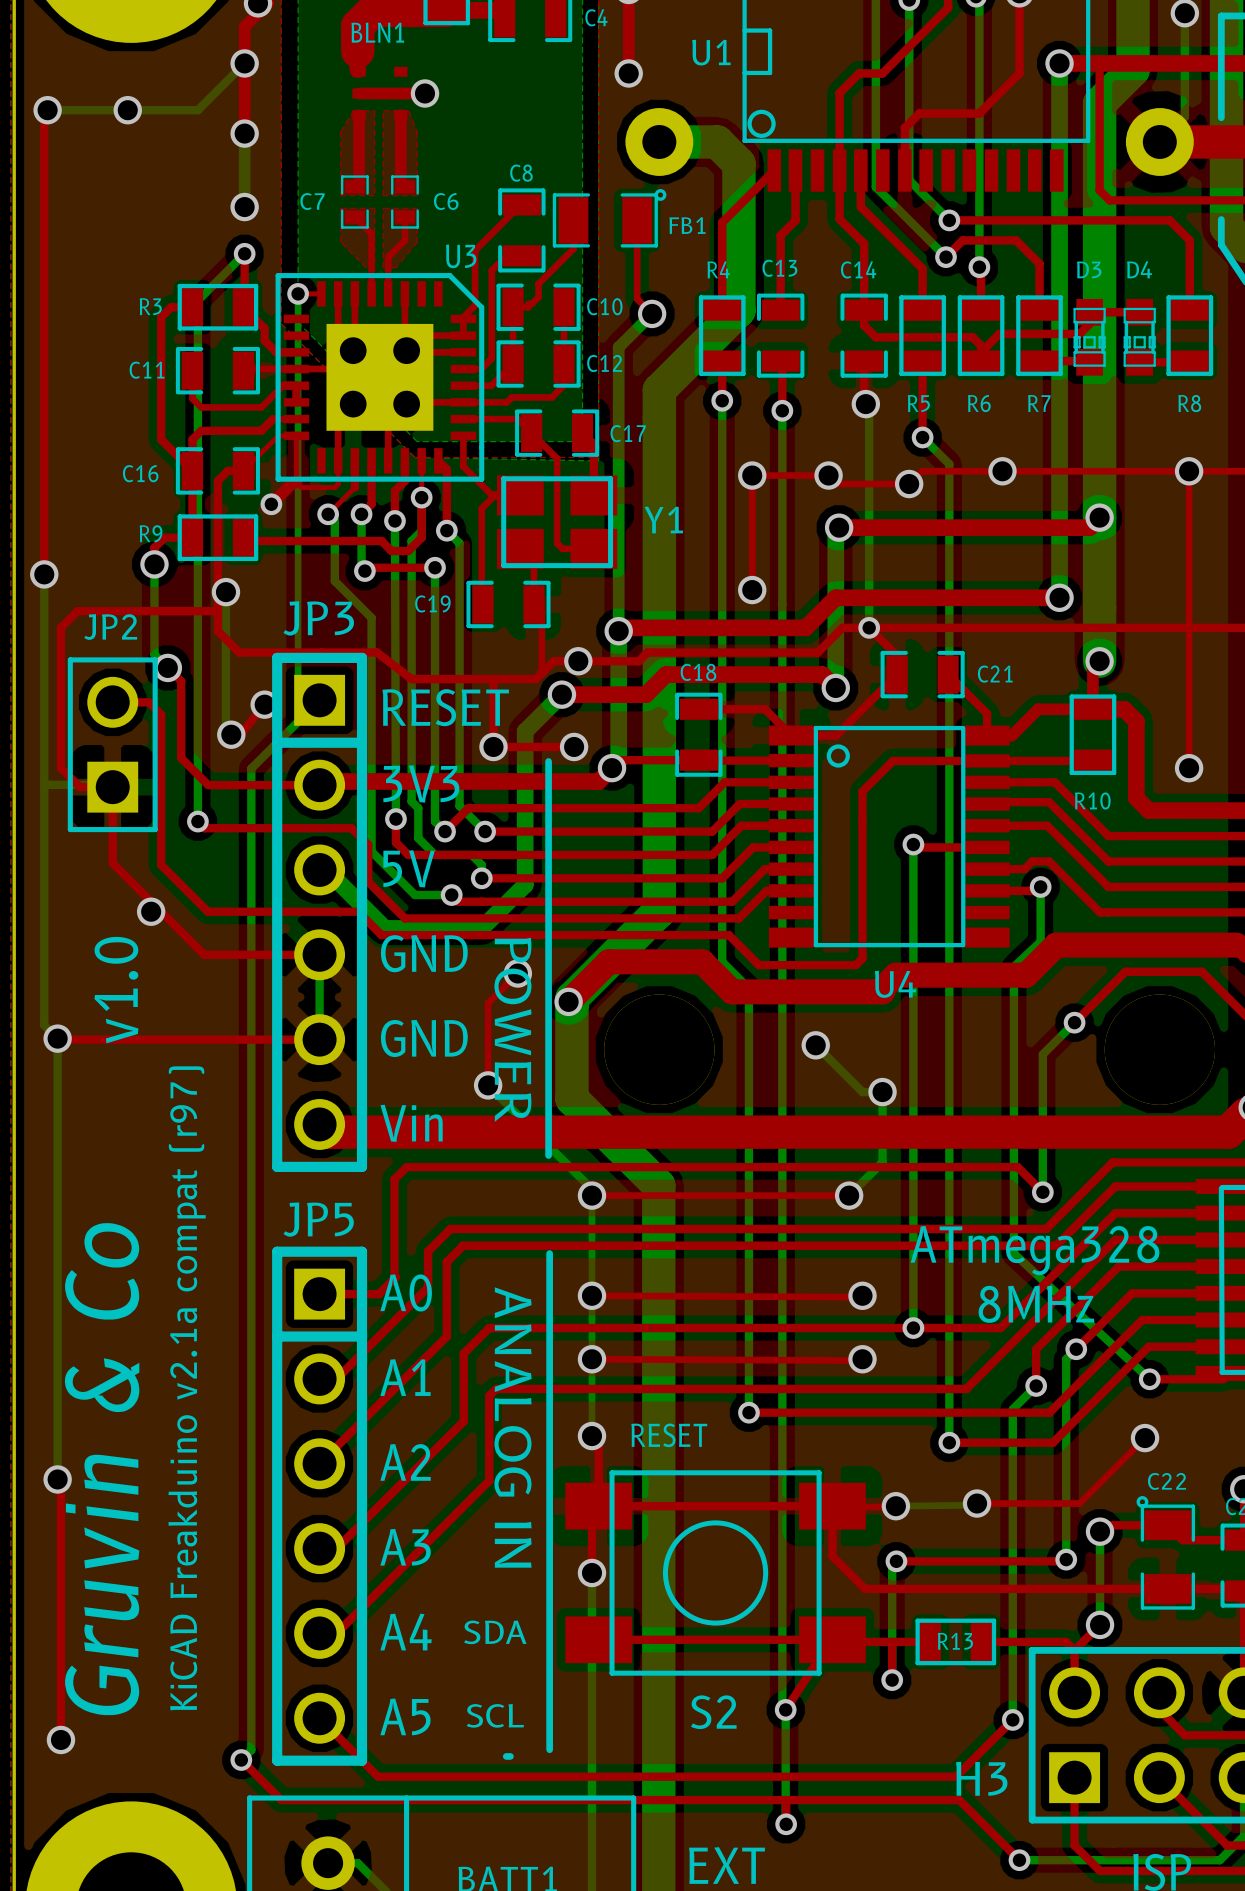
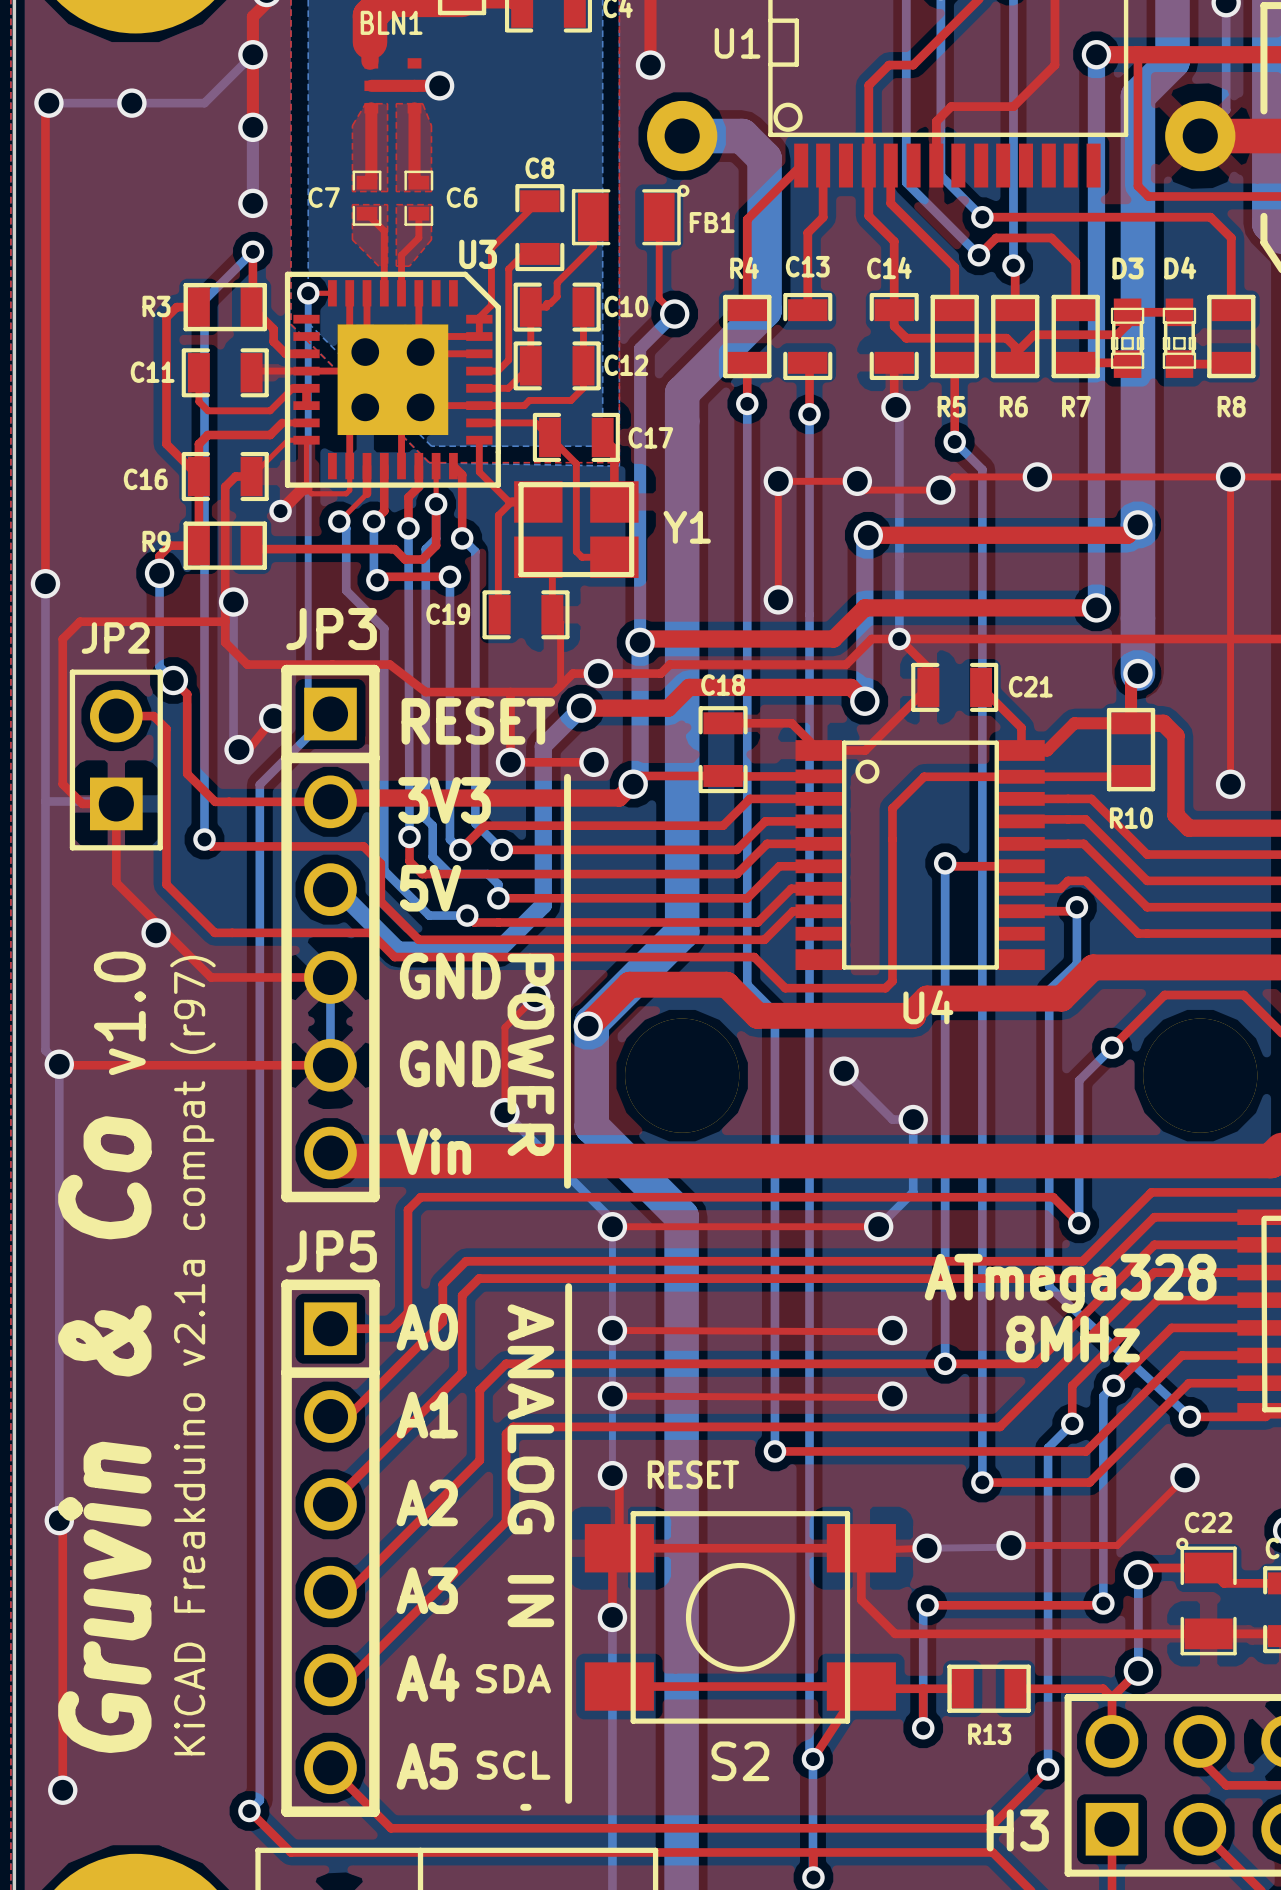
R13 name position: R13 (955, 1641) -> R13 (989, 1734)

